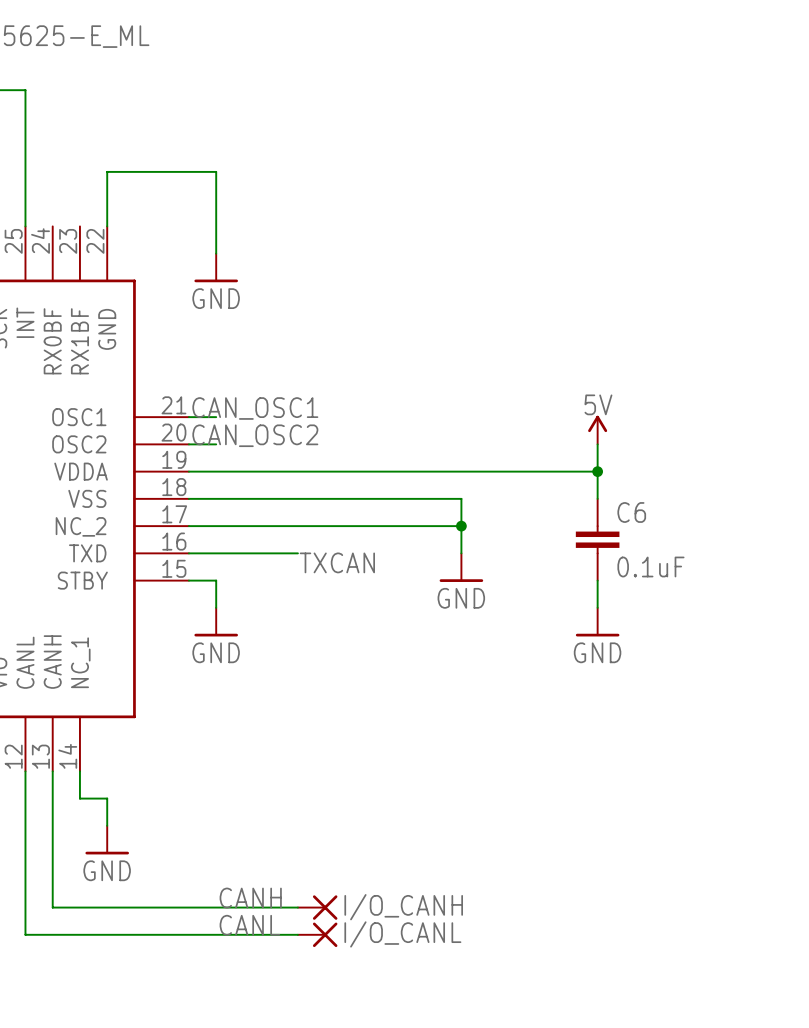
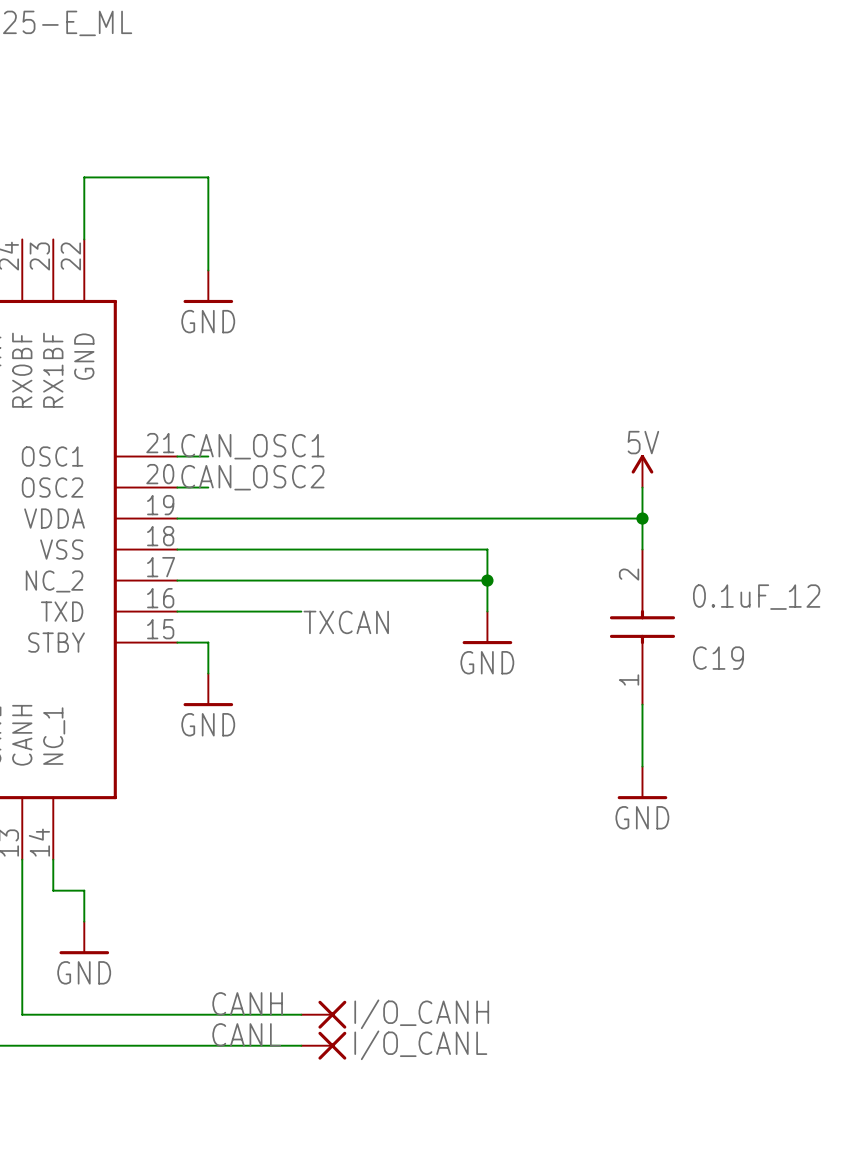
C6: 0.1uF (597, 539) -> none
C19: none -> 0.1uF_12 (642, 627)
power symbol position: GND (597, 622) -> GND (642, 782)
wire: none -> (642, 704) (642, 766)

